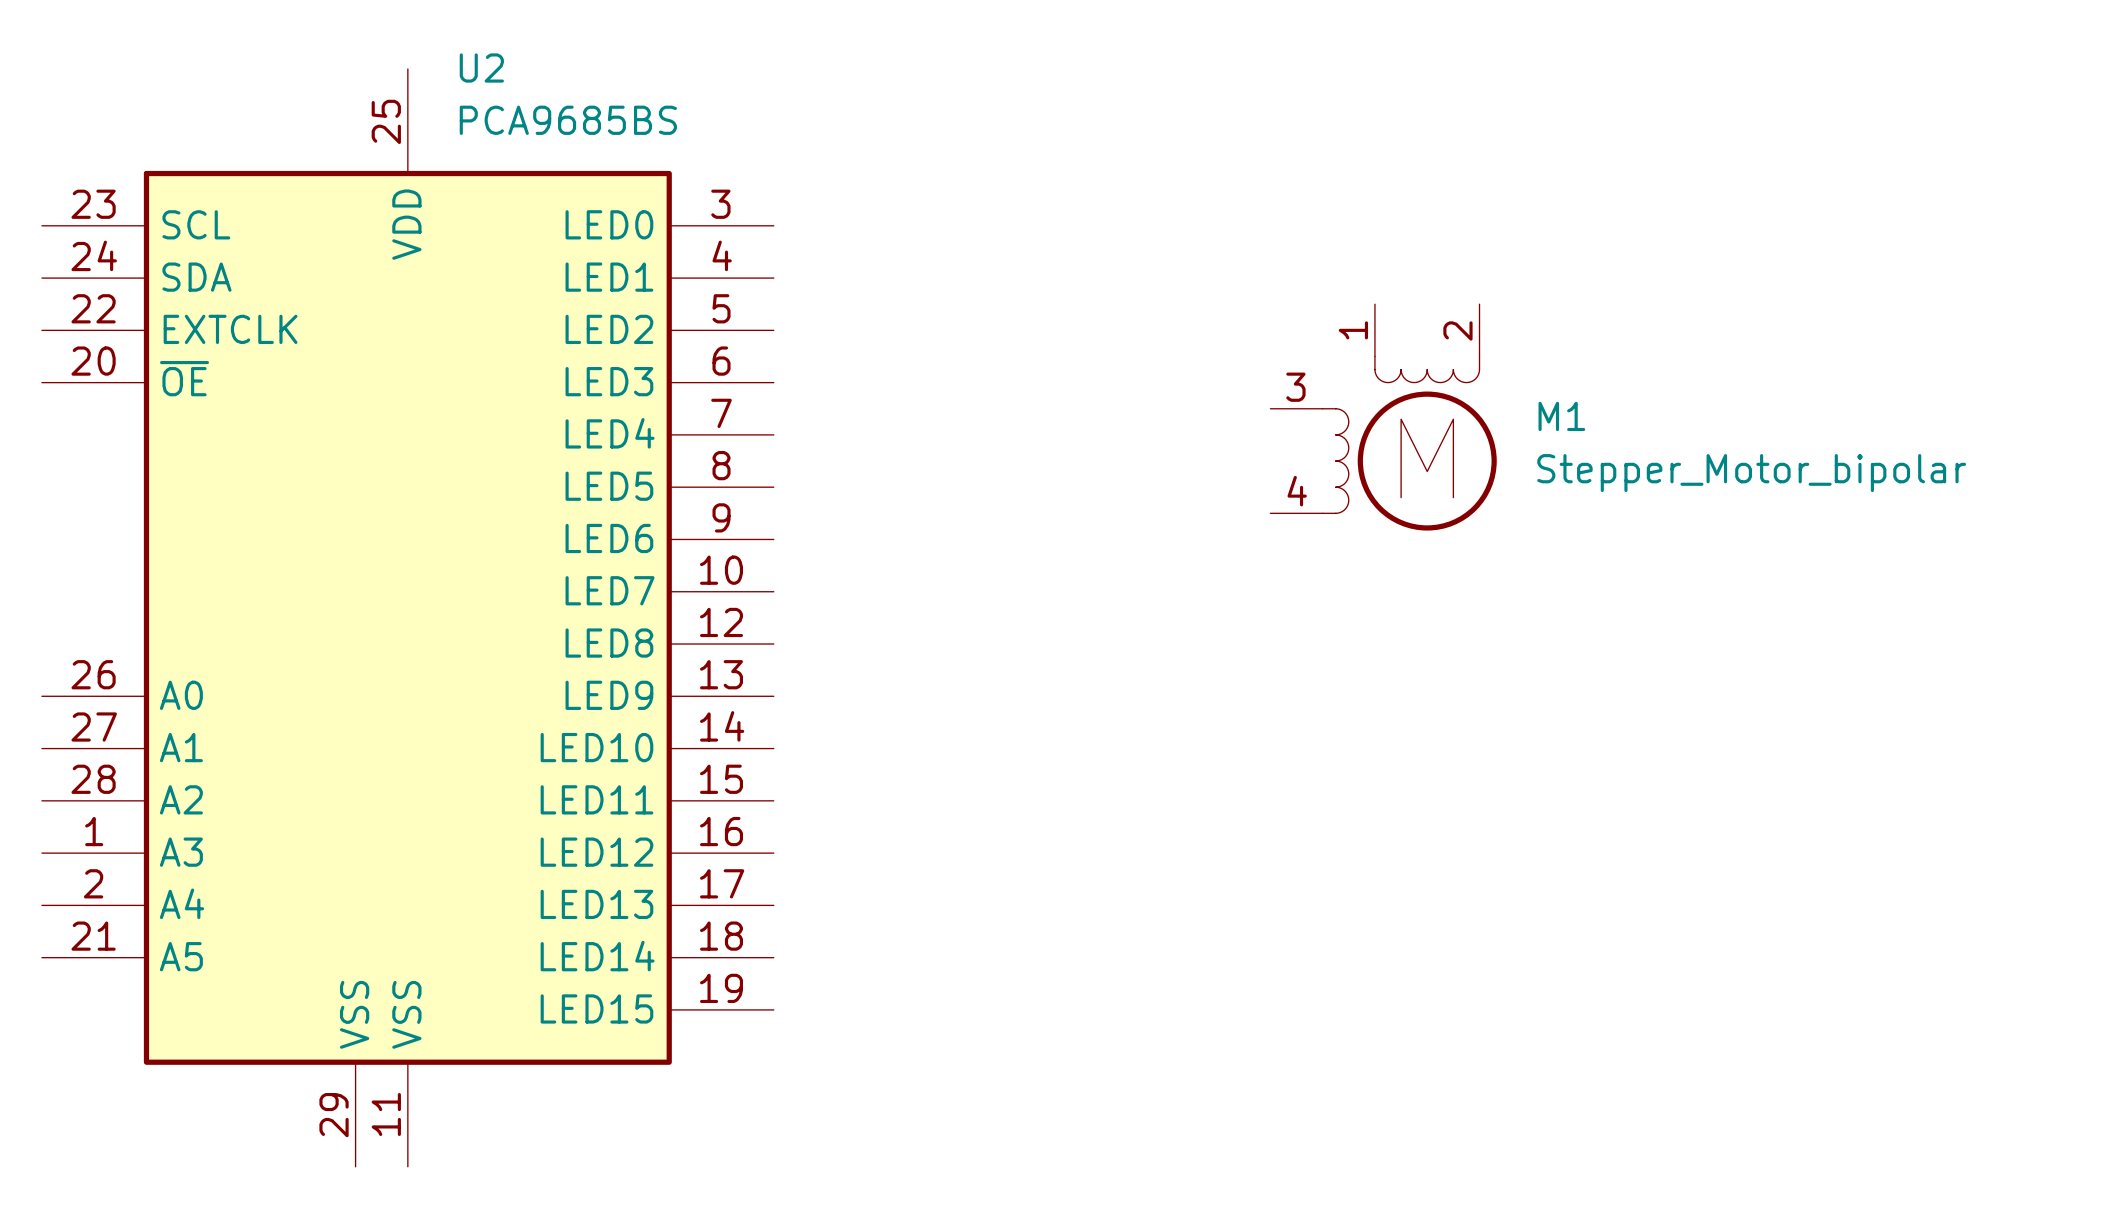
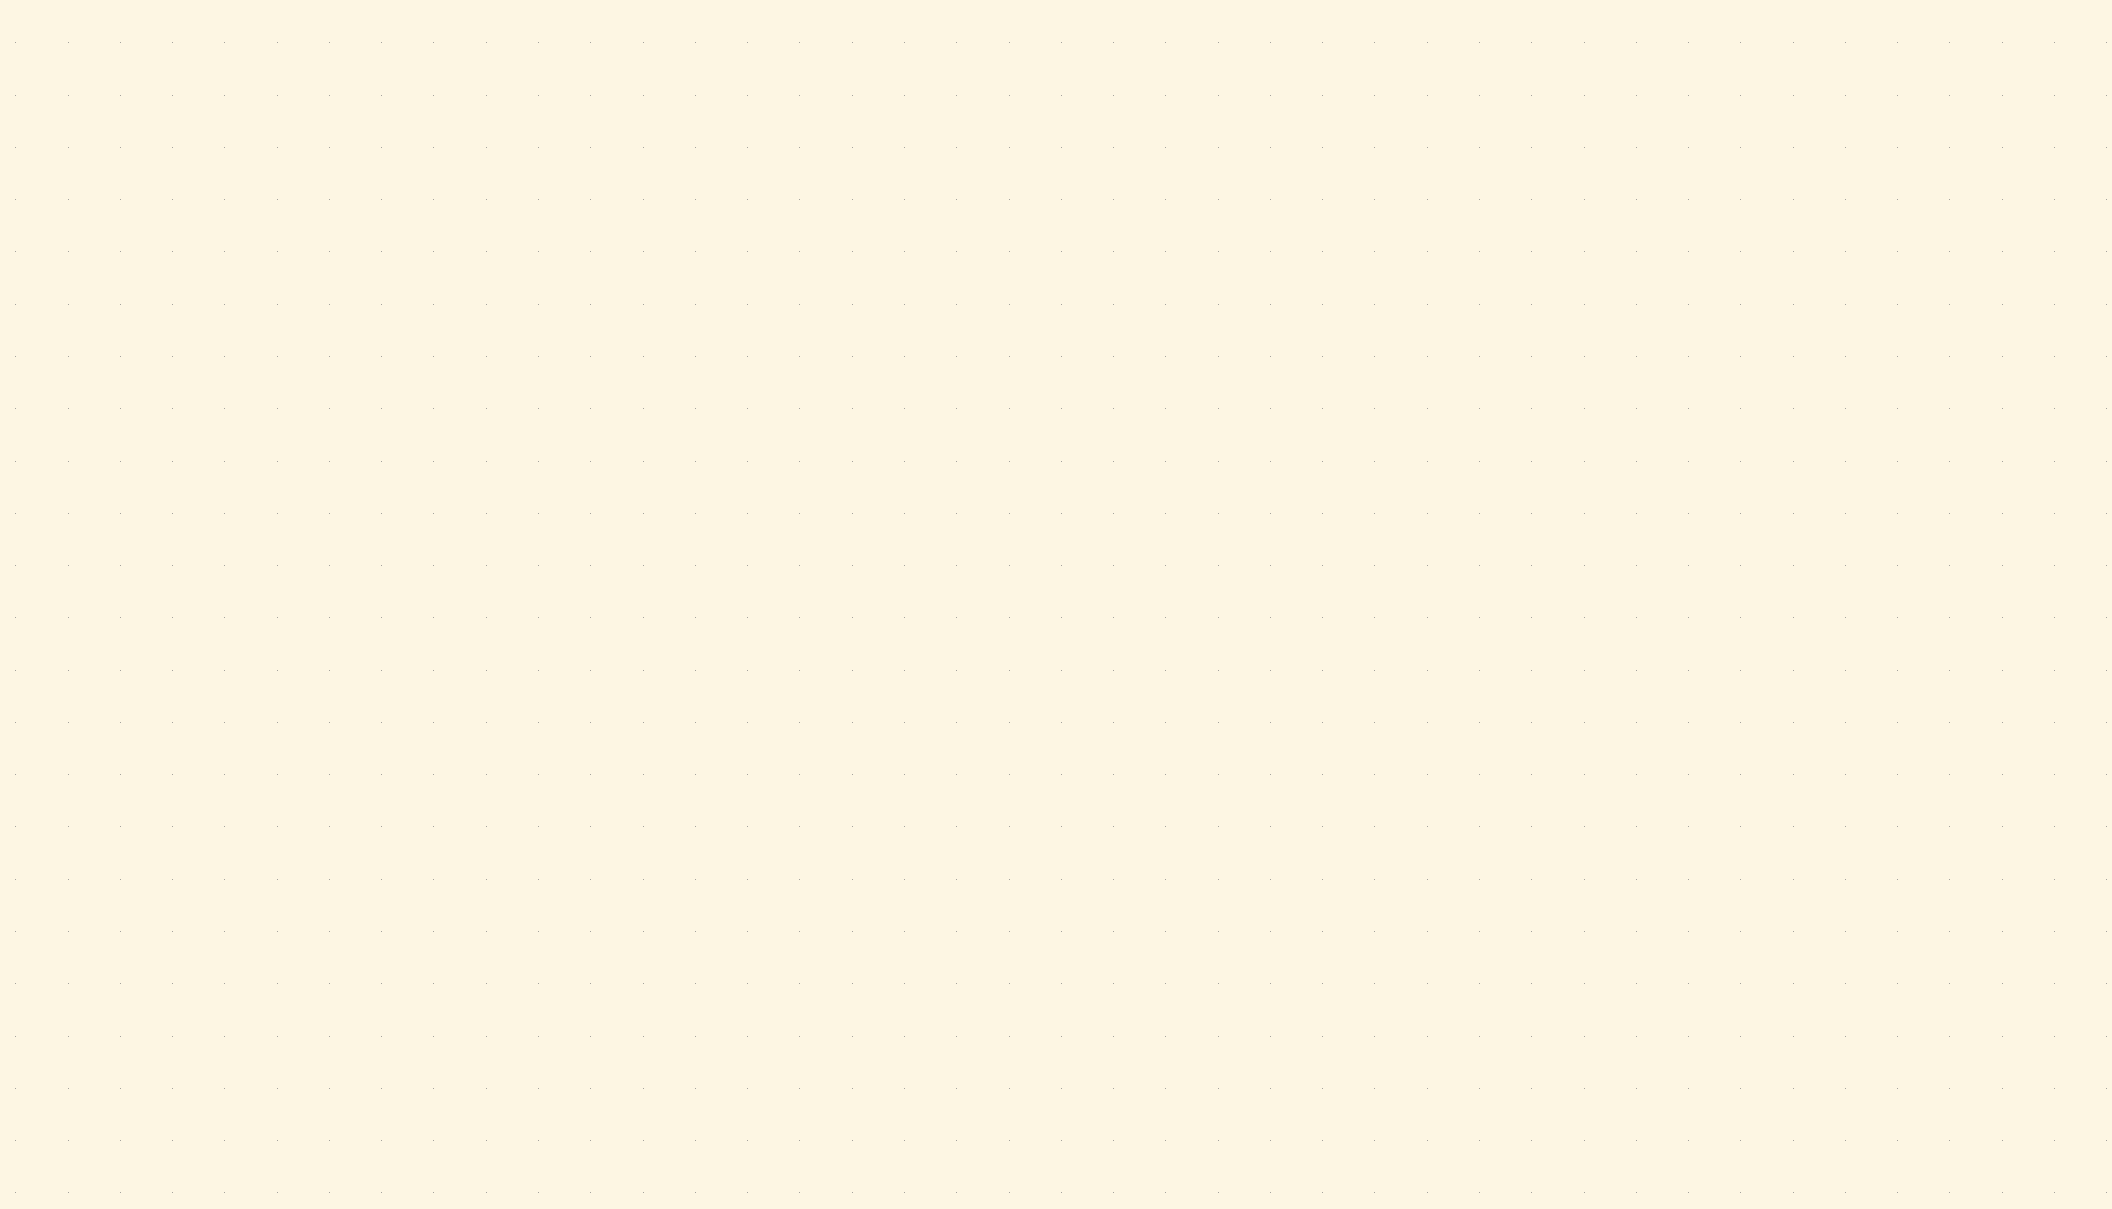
M1: Stepper_Motor_bipolar (1383, 417) -> none
U2: PCA9685BS (407, 617) -> none

